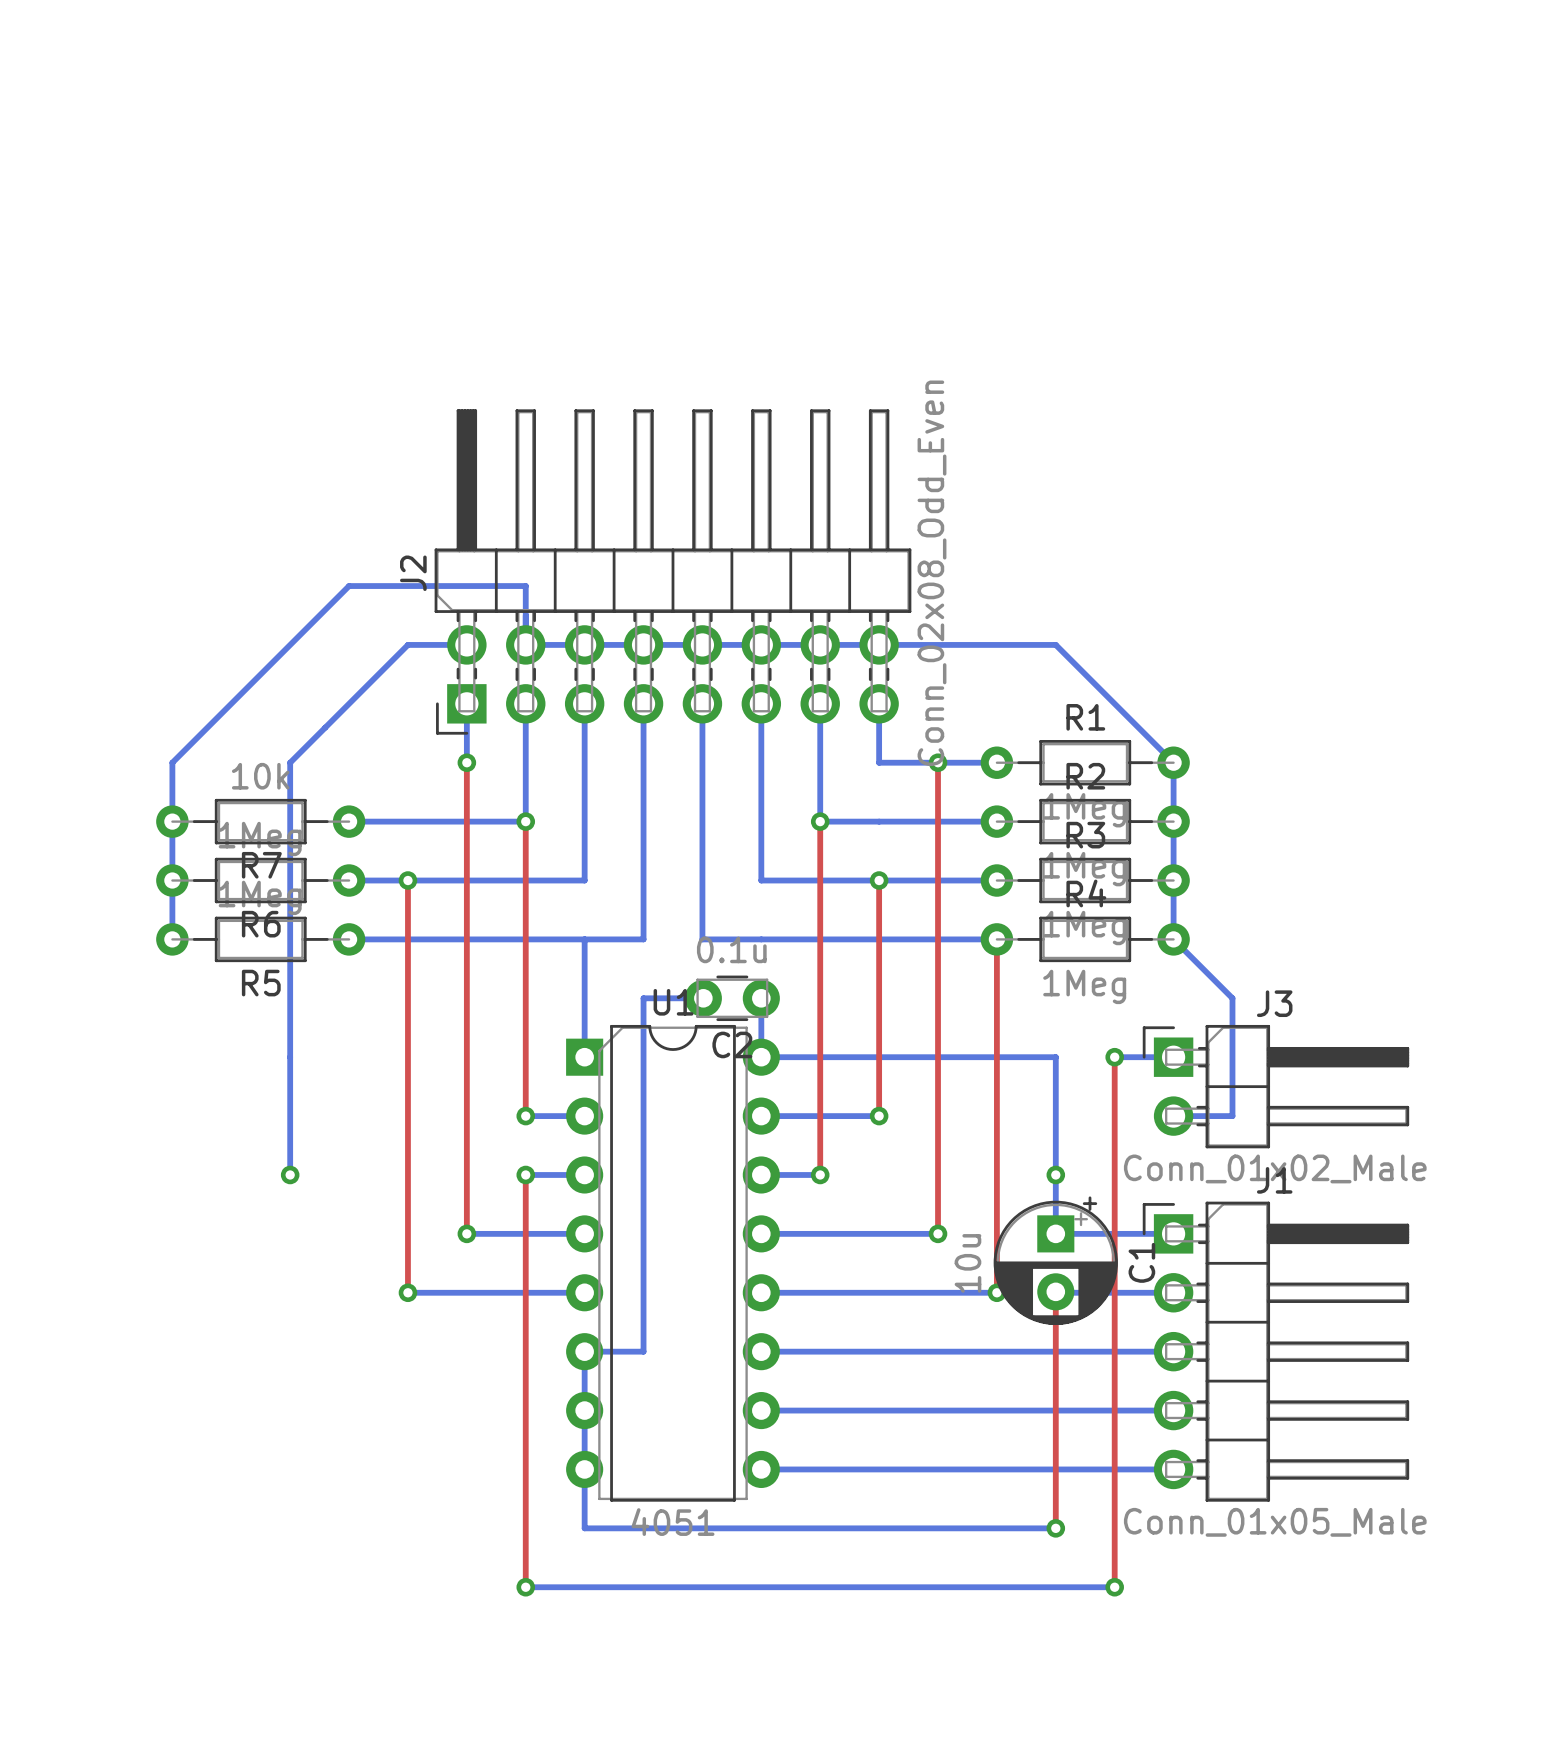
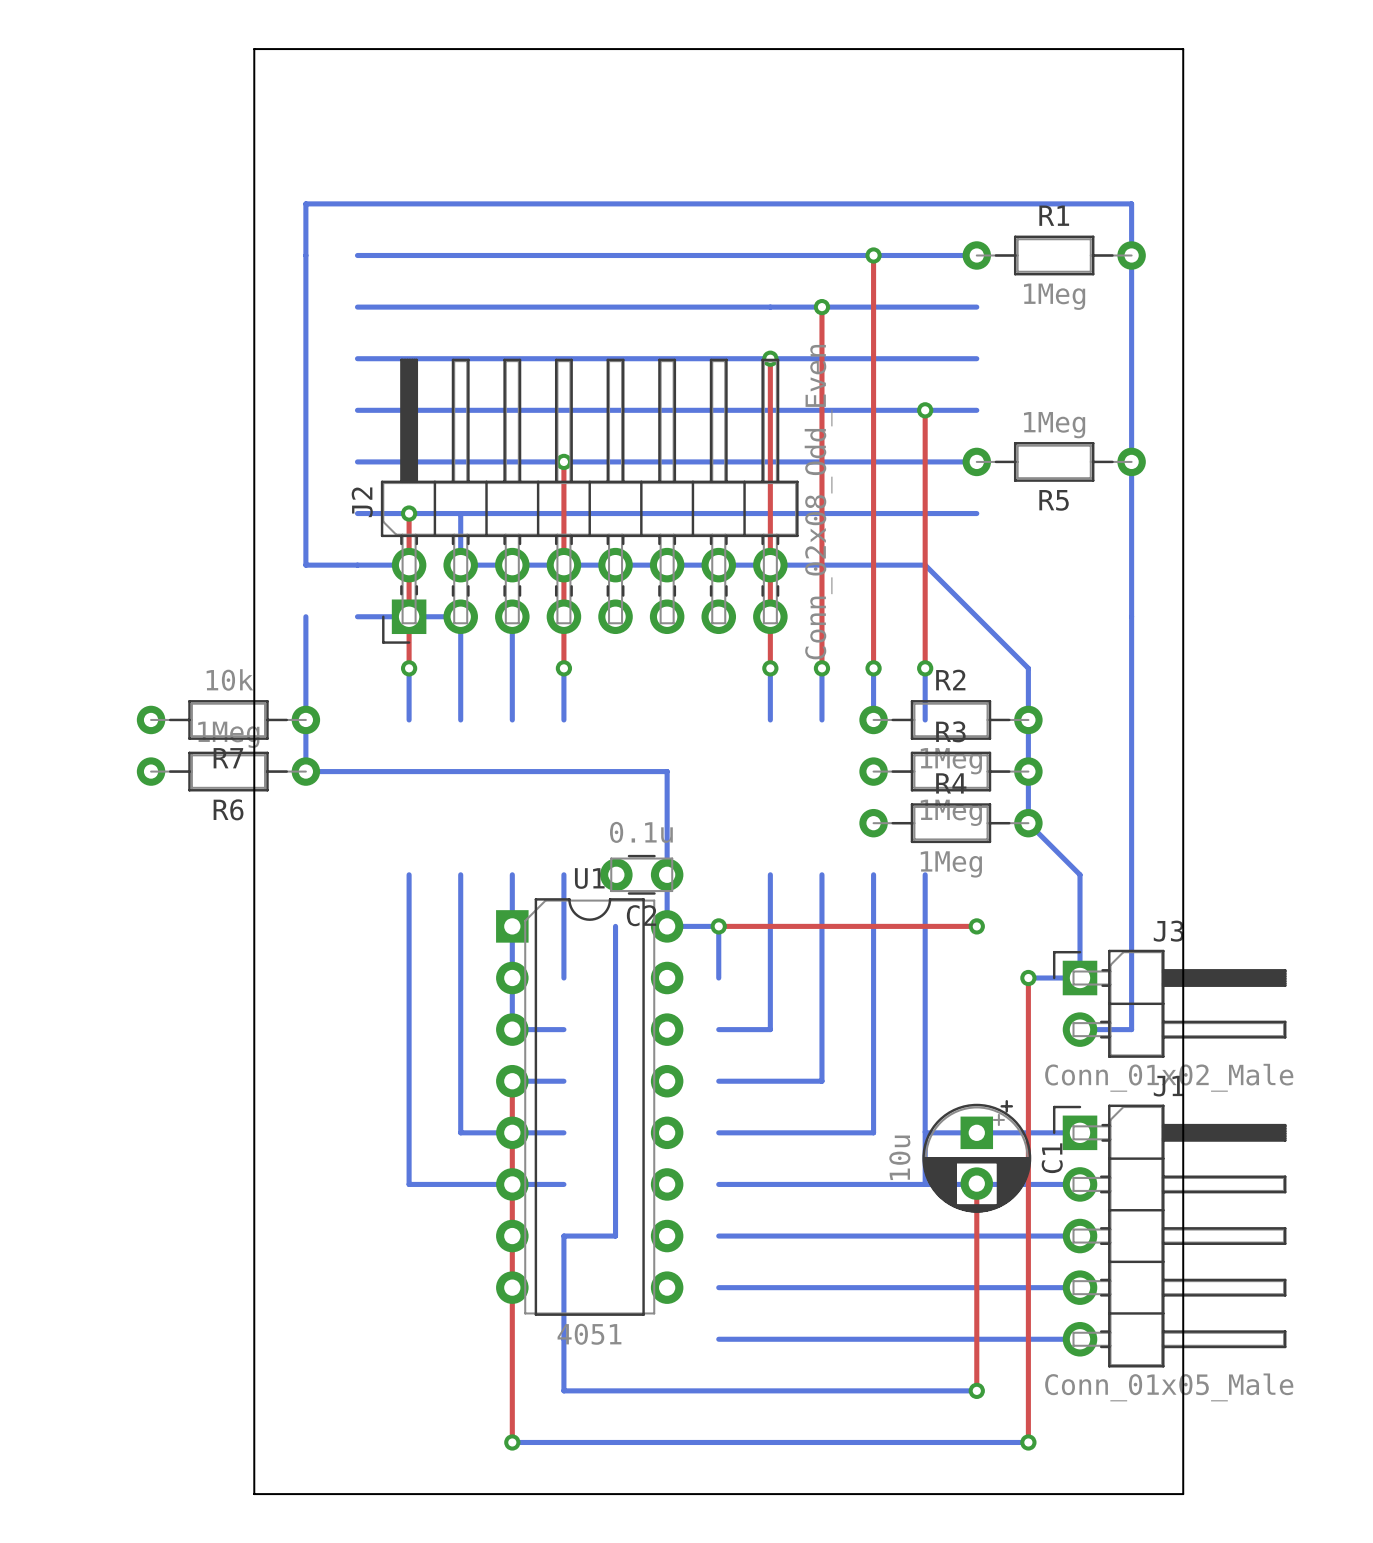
board edge: none -> (254, 49) (254, 1494) (1183, 1494) (1183, 49) (254, 49)
bottom track: none -> (357, 255) (976, 255)
top track: none -> (873, 255) (873, 668)
via: none -> (873, 255)
bottom track: none -> (357, 307) (976, 307)
via: none -> (821, 307)
bottom track: none -> (357, 358) (976, 358)
via: none -> (770, 358)
bottom track: none -> (357, 410) (976, 410)
top track: none -> (925, 410) (925, 668)
via: none -> (925, 410)
bottom track: none -> (357, 461) (976, 461)
via: none -> (563, 461)
bottom track: (407, 586) (349, 586) (172, 762) (172, 939) -> none
via: none -> (409, 513)
bottom track: none -> (460, 513) (976, 513)
bottom track: (407, 644) (290, 762) (290, 1174) -> (357, 565) (305, 565) (305, 203) (1131, 203) (1131, 1029) (1080, 1029)
bottom track: none -> (305, 616) (305, 771)
bottom track: (466, 703) (466, 762) -> (409, 719) (409, 668)
bottom track: (643, 703) (643, 762) -> (925, 668) (925, 719)
bottom track: (702, 703) (702, 939) (996, 939) -> none
bottom track: (761, 703) (761, 880) (996, 880) -> none
bottom track: (820, 703) (820, 821) (996, 821) -> none
bottom track: (879, 703) (879, 762) (996, 762) -> (873, 719) (873, 668)
top track: (466, 762) (466, 1233) -> (409, 668) (409, 513)
via: none -> (563, 668)
bottom track: none -> (770, 668) (770, 719)
via: none -> (770, 668)
bottom track: none -> (821, 668) (821, 719)
top track: (938, 762) (938, 1233) -> (821, 668) (821, 307)
via: none -> (873, 668)
via: none -> (925, 668)
R1 position: (1085, 762) -> (1054, 255)
bottom track: (349, 821) (525, 821) -> none
top track: (525, 821) (525, 1116) -> none
via: (525, 821) -> none
bottom track: (584, 821) (584, 880) -> (667, 874) (667, 771) (512, 771)
bottom track: (643, 821) (643, 939) (349, 939) -> none
top track: (820, 821) (820, 1174) -> (770, 358) (770, 668)
via: (820, 821) -> none
top track: (407, 880) (407, 1292) -> none
via: (407, 880) -> none
top track: (879, 880) (879, 1116) -> (563, 461) (563, 668)
via: (879, 880) -> none
R5 position: (260, 939) -> (1054, 461)
bottom track: (584, 939) (584, 998) -> (925, 874) (925, 926)
top track: (996, 939) (996, 1292) -> none
bottom track: (643, 998) (703, 998) -> none
bottom track: none -> (873, 874) (873, 1132)
bottom track: none -> (512, 926) (512, 1029) (563, 1029)
bottom track: (820, 1057) (1055, 1057) -> (718, 926) (718, 978)
via: none -> (718, 926)
bottom track: (1114, 1057) (1173, 1057) -> none
top track: (1114, 1057) (1114, 1350) -> (976, 926) (718, 926)
J3 position: (1275, 1086) -> (1169, 1003)
bottom track: (525, 1116) (584, 1116) -> none
via: (525, 1116) -> none
bottom track: (643, 1116) (643, 1351) -> (821, 874) (821, 1081)
bottom track: (761, 1116) (879, 1116) -> (357, 616) (460, 616)
via: (879, 1116) -> none
top track: none -> (1028, 978) (1028, 1442)
via: none -> (1028, 978)
via: (290, 1174) -> none
bottom track: (525, 1174) (584, 1174) -> (512, 1132) (563, 1132)
top track: (525, 1174) (525, 1587) -> (512, 1081) (512, 1442)
via: (525, 1174) -> none
bottom track: (761, 1174) (820, 1174) -> (770, 874) (770, 1029) (718, 1029)
via: (820, 1174) -> none
via: (1055, 1174) -> none
bottom track: (466, 1233) (584, 1233) -> (563, 1081) (512, 1081)
via: (466, 1233) -> none
bottom track: (761, 1233) (820, 1233) -> (1028, 1132) (1080, 1132)
via: (938, 1233) -> none
bottom track: (1055, 1233) (1173, 1233) -> (925, 1081) (925, 1184)
C1 position: (1055, 1260) -> (976, 1156)
top track: (1055, 1291) (1055, 1528) -> none
bottom track: (407, 1292) (525, 1292) -> (460, 874) (460, 1132)
via: (407, 1292) -> none
bottom track: (761, 1292) (820, 1292) -> (1028, 1184) (1080, 1184)
via: (996, 1292) -> none
bottom track: (584, 1351) (584, 1528) (820, 1528) -> (512, 1184) (409, 1184) (409, 874)
bottom track: (761, 1351) (820, 1351) -> (1028, 1236) (1080, 1236)
J1 position: (1275, 1351) -> (1169, 1236)
bottom track: (761, 1410) (820, 1410) -> (1028, 1287) (1080, 1287)
bottom track: (761, 1469) (820, 1469) -> none
bottom track: none -> (925, 1339) (1080, 1339)
via: (1055, 1528) -> none
bottom track: (525, 1587) (643, 1587) -> (615, 926) (615, 1236) (563, 1236) (563, 1390)
via position: (525, 1587) -> (512, 1442)
bottom track: none -> (512, 1442) (1028, 1442)
via: none -> (1028, 1442)

